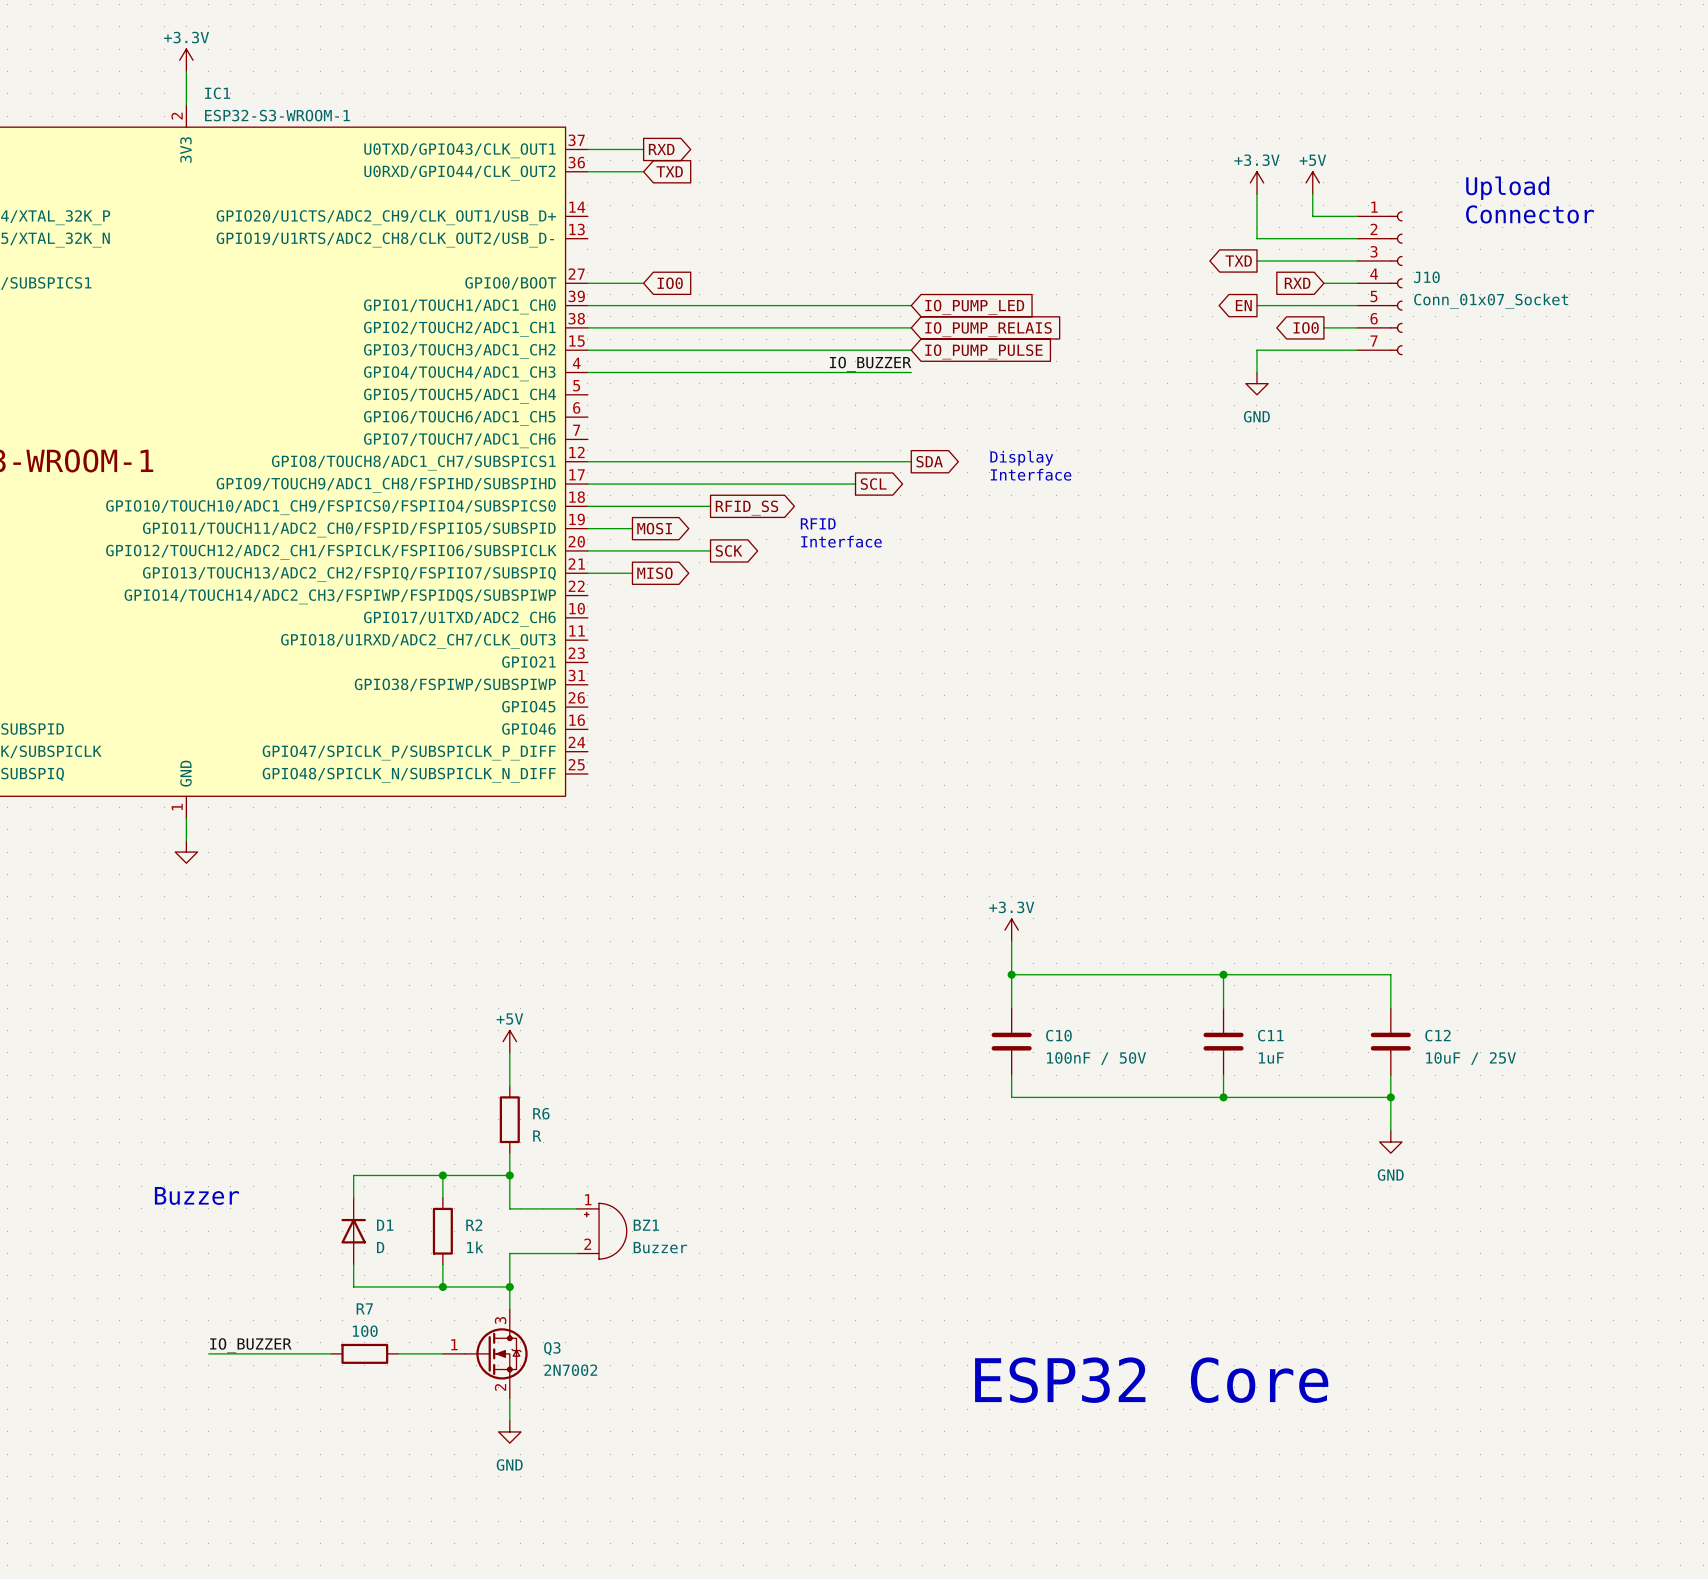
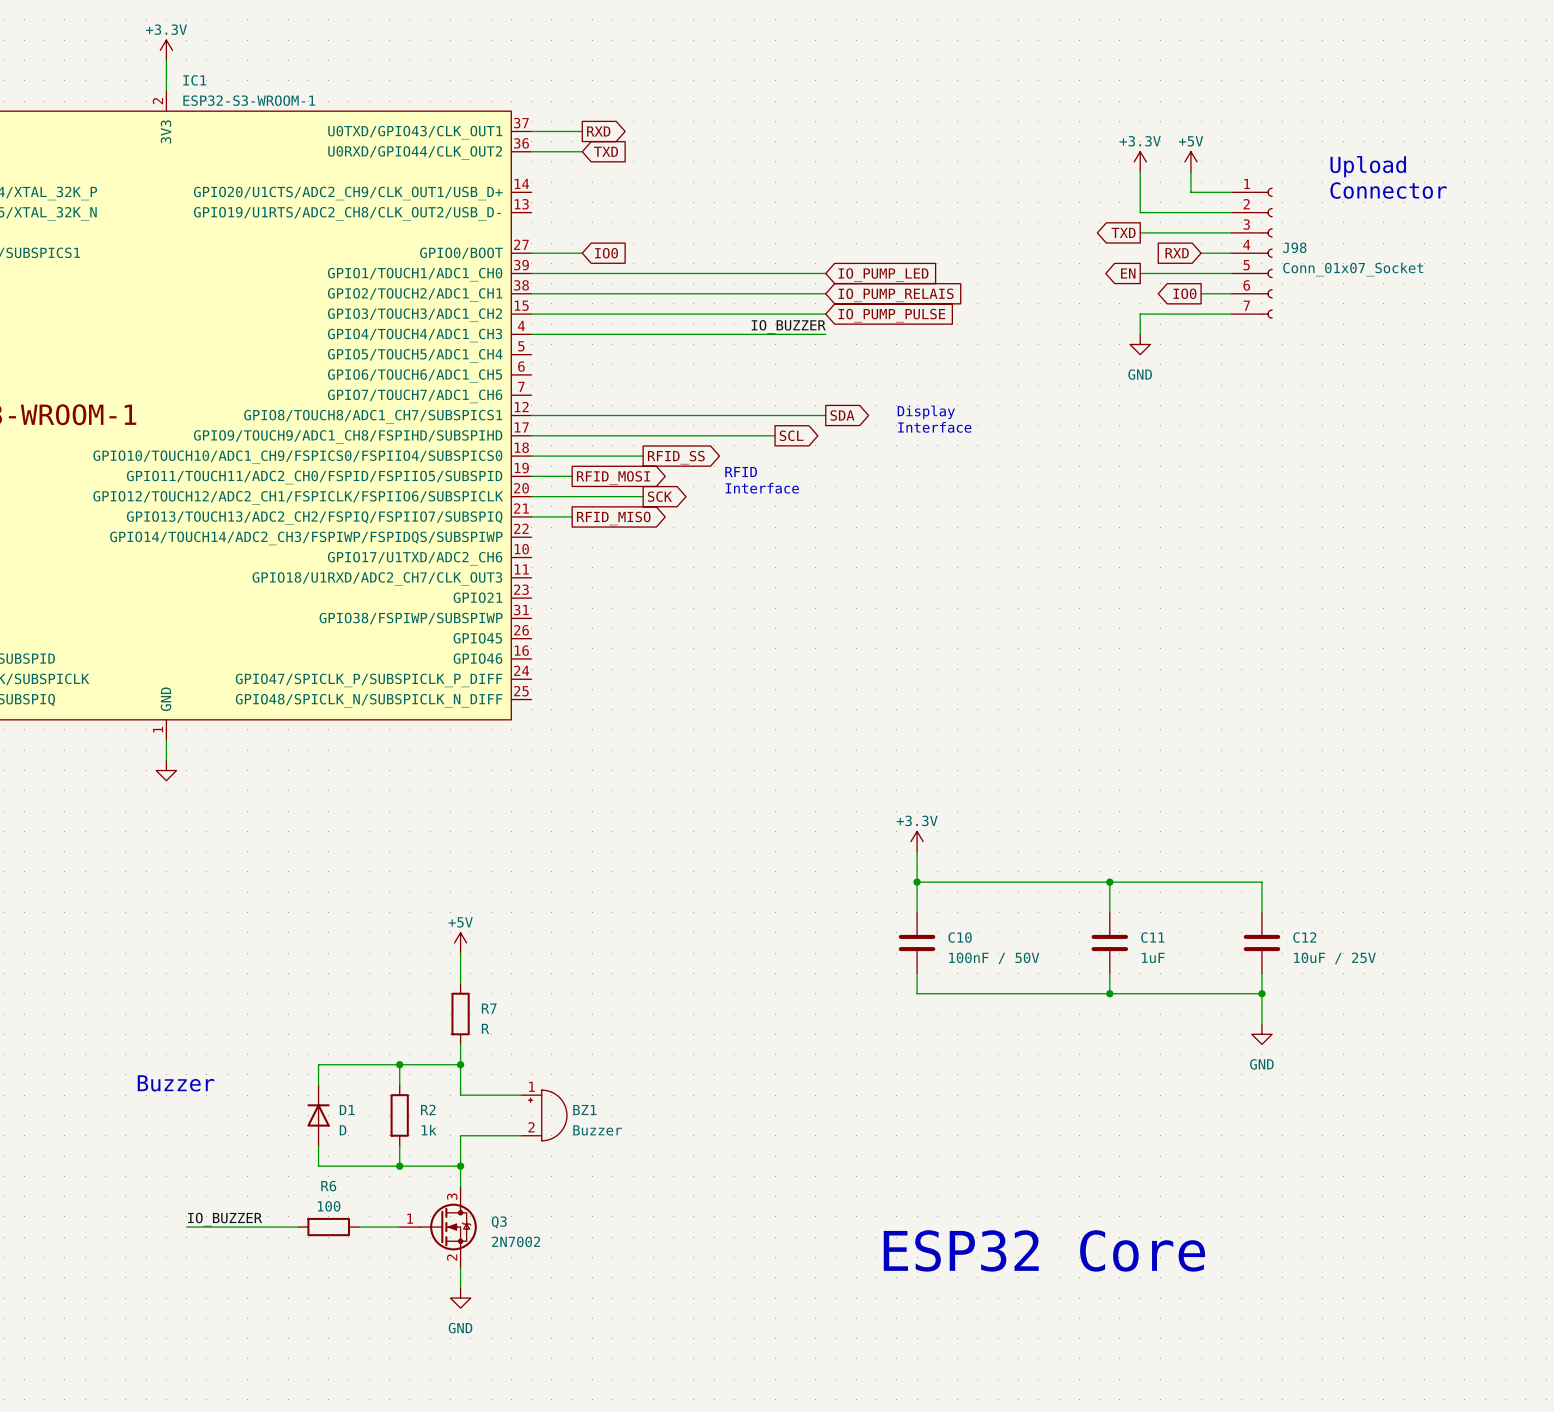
J10 name: J10 (1426, 277) -> J98 (1294, 247)
global label: MOSI (654, 528) -> RFID_MOSI (613, 477)
global label: MISO (654, 573) -> RFID_MISO (613, 518)
R6 name: R6 (541, 1113) -> R7 (489, 1008)
R7 name: R7 (364, 1308) -> R6 (328, 1186)

